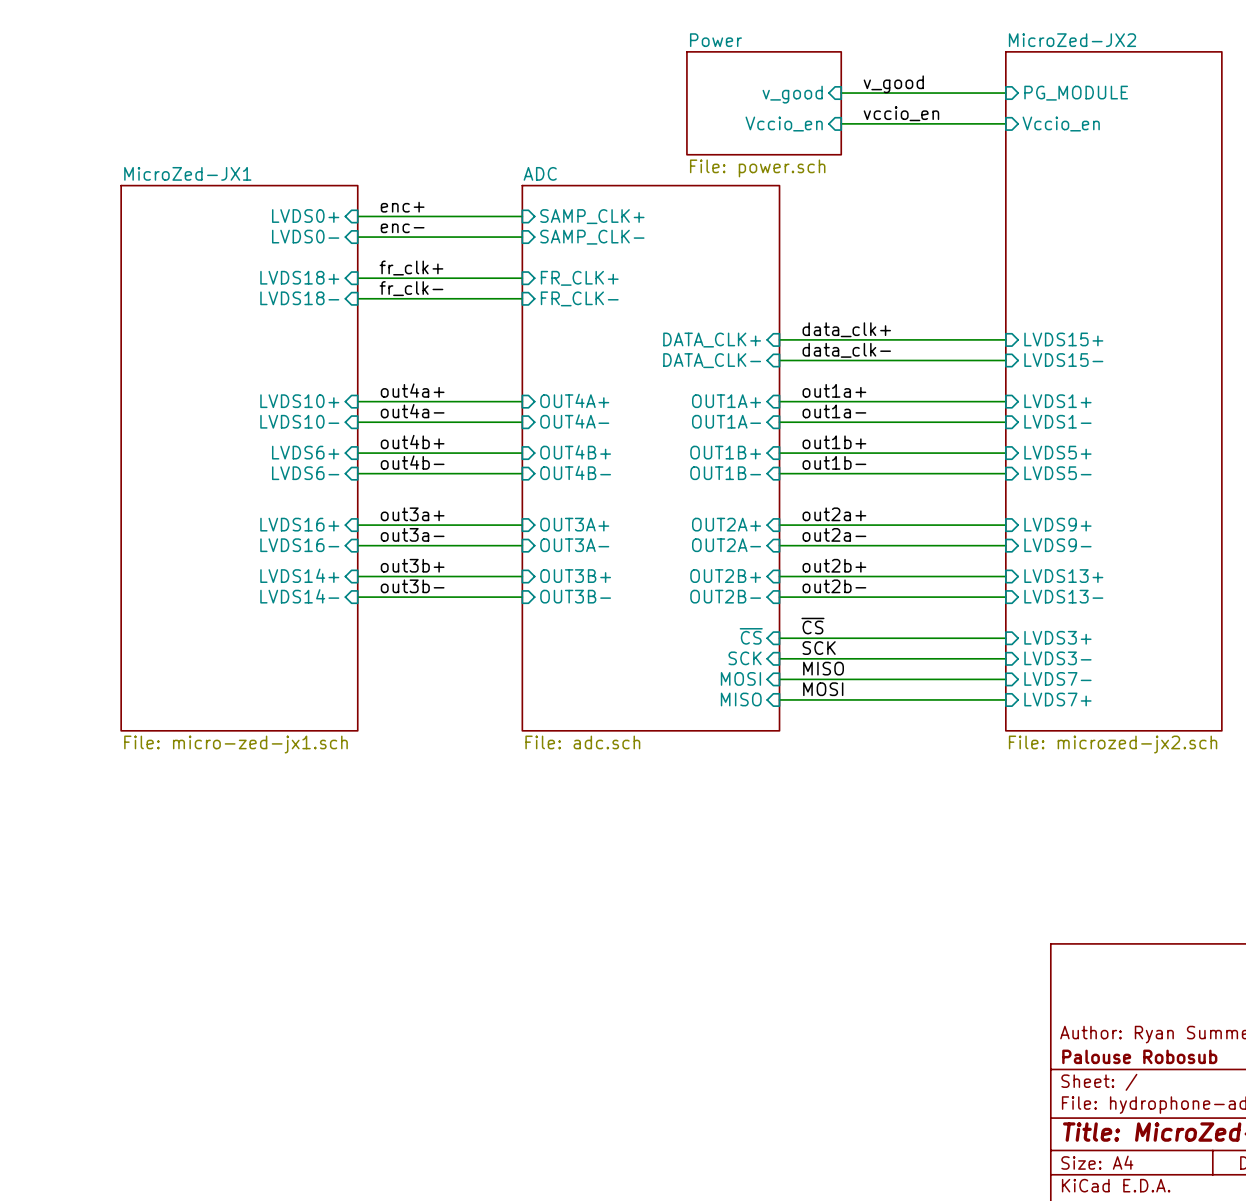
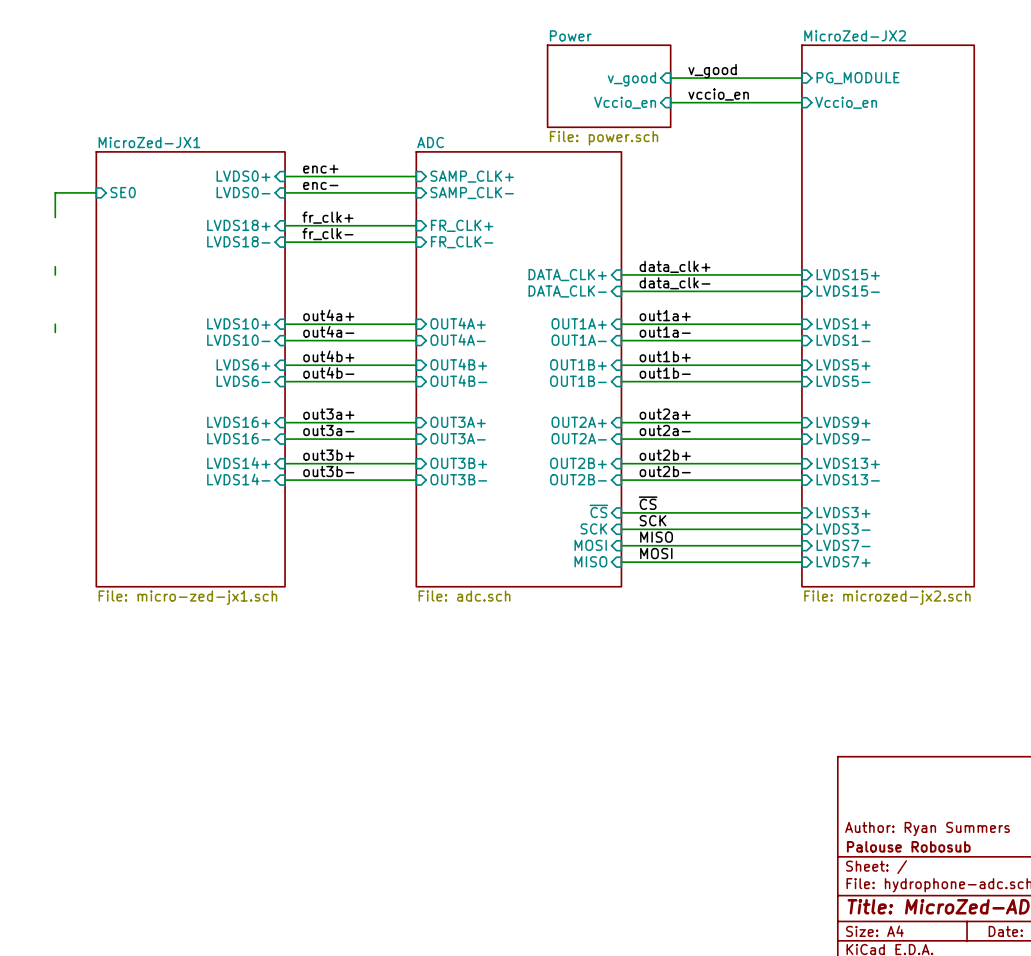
sheet pin: none -> SE0 (123, 192)
wire: none -> (96, 192) (55, 192) (55, 217)
wire: none -> (55, 266) (55, 274)
wire: none -> (55, 324) (55, 332)

